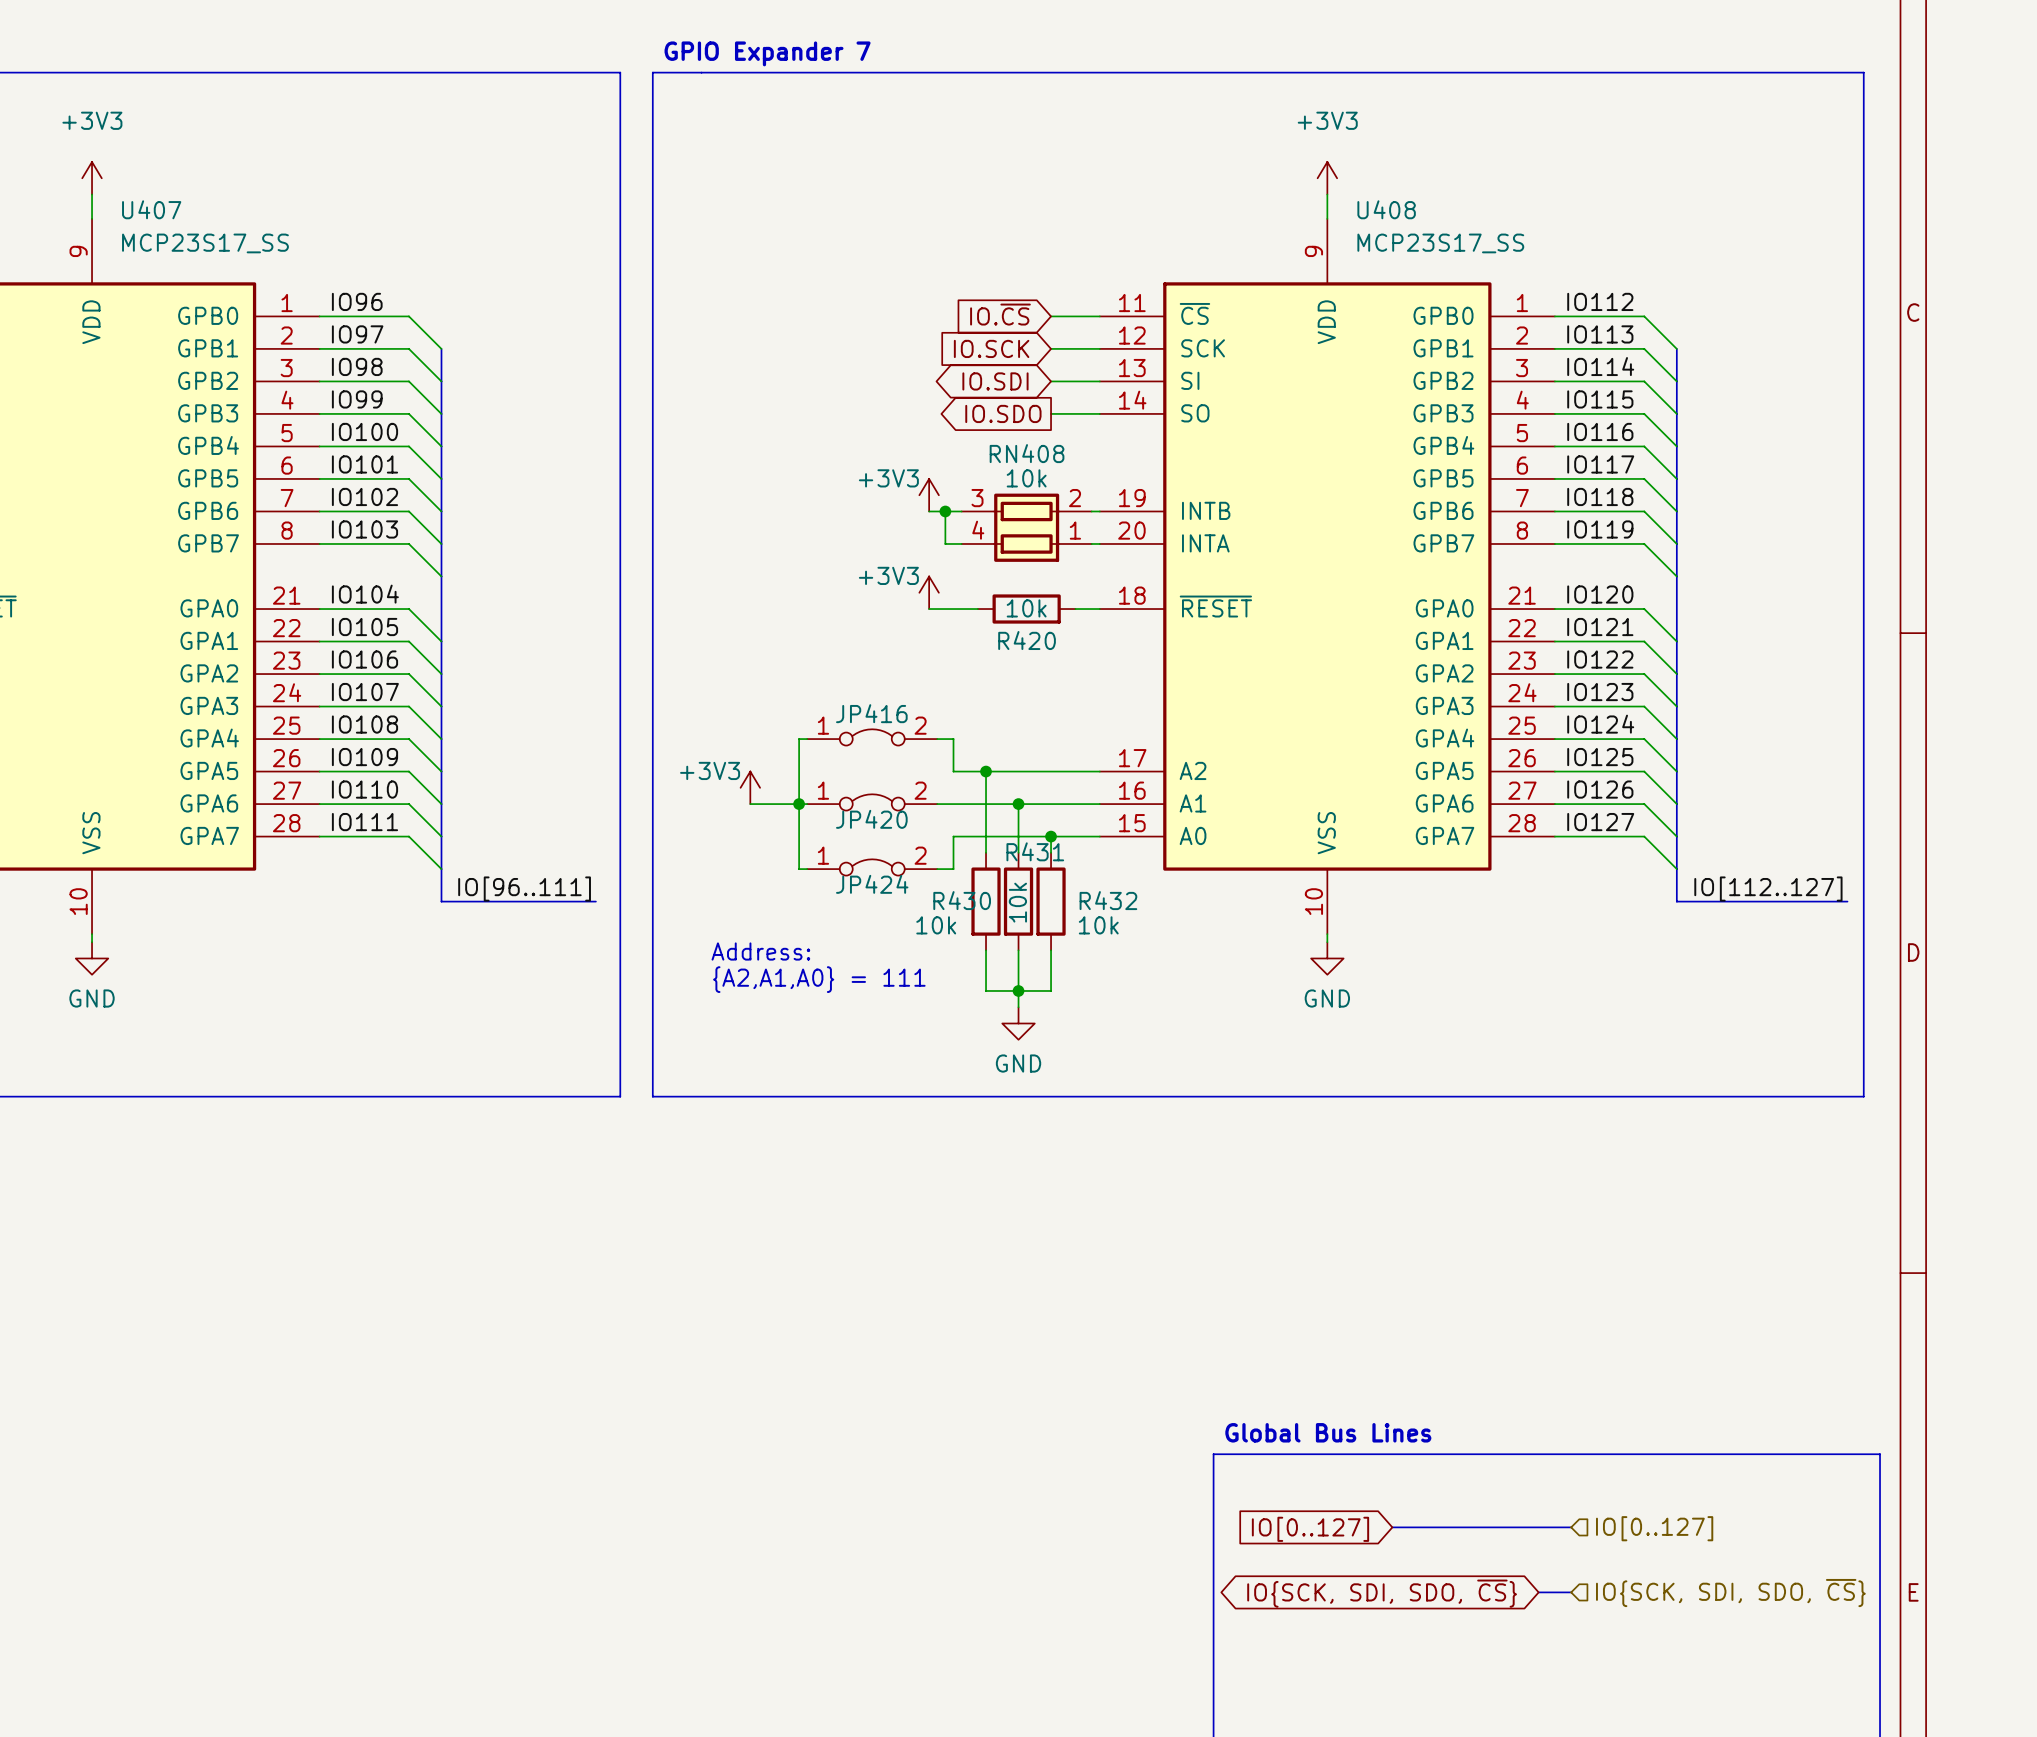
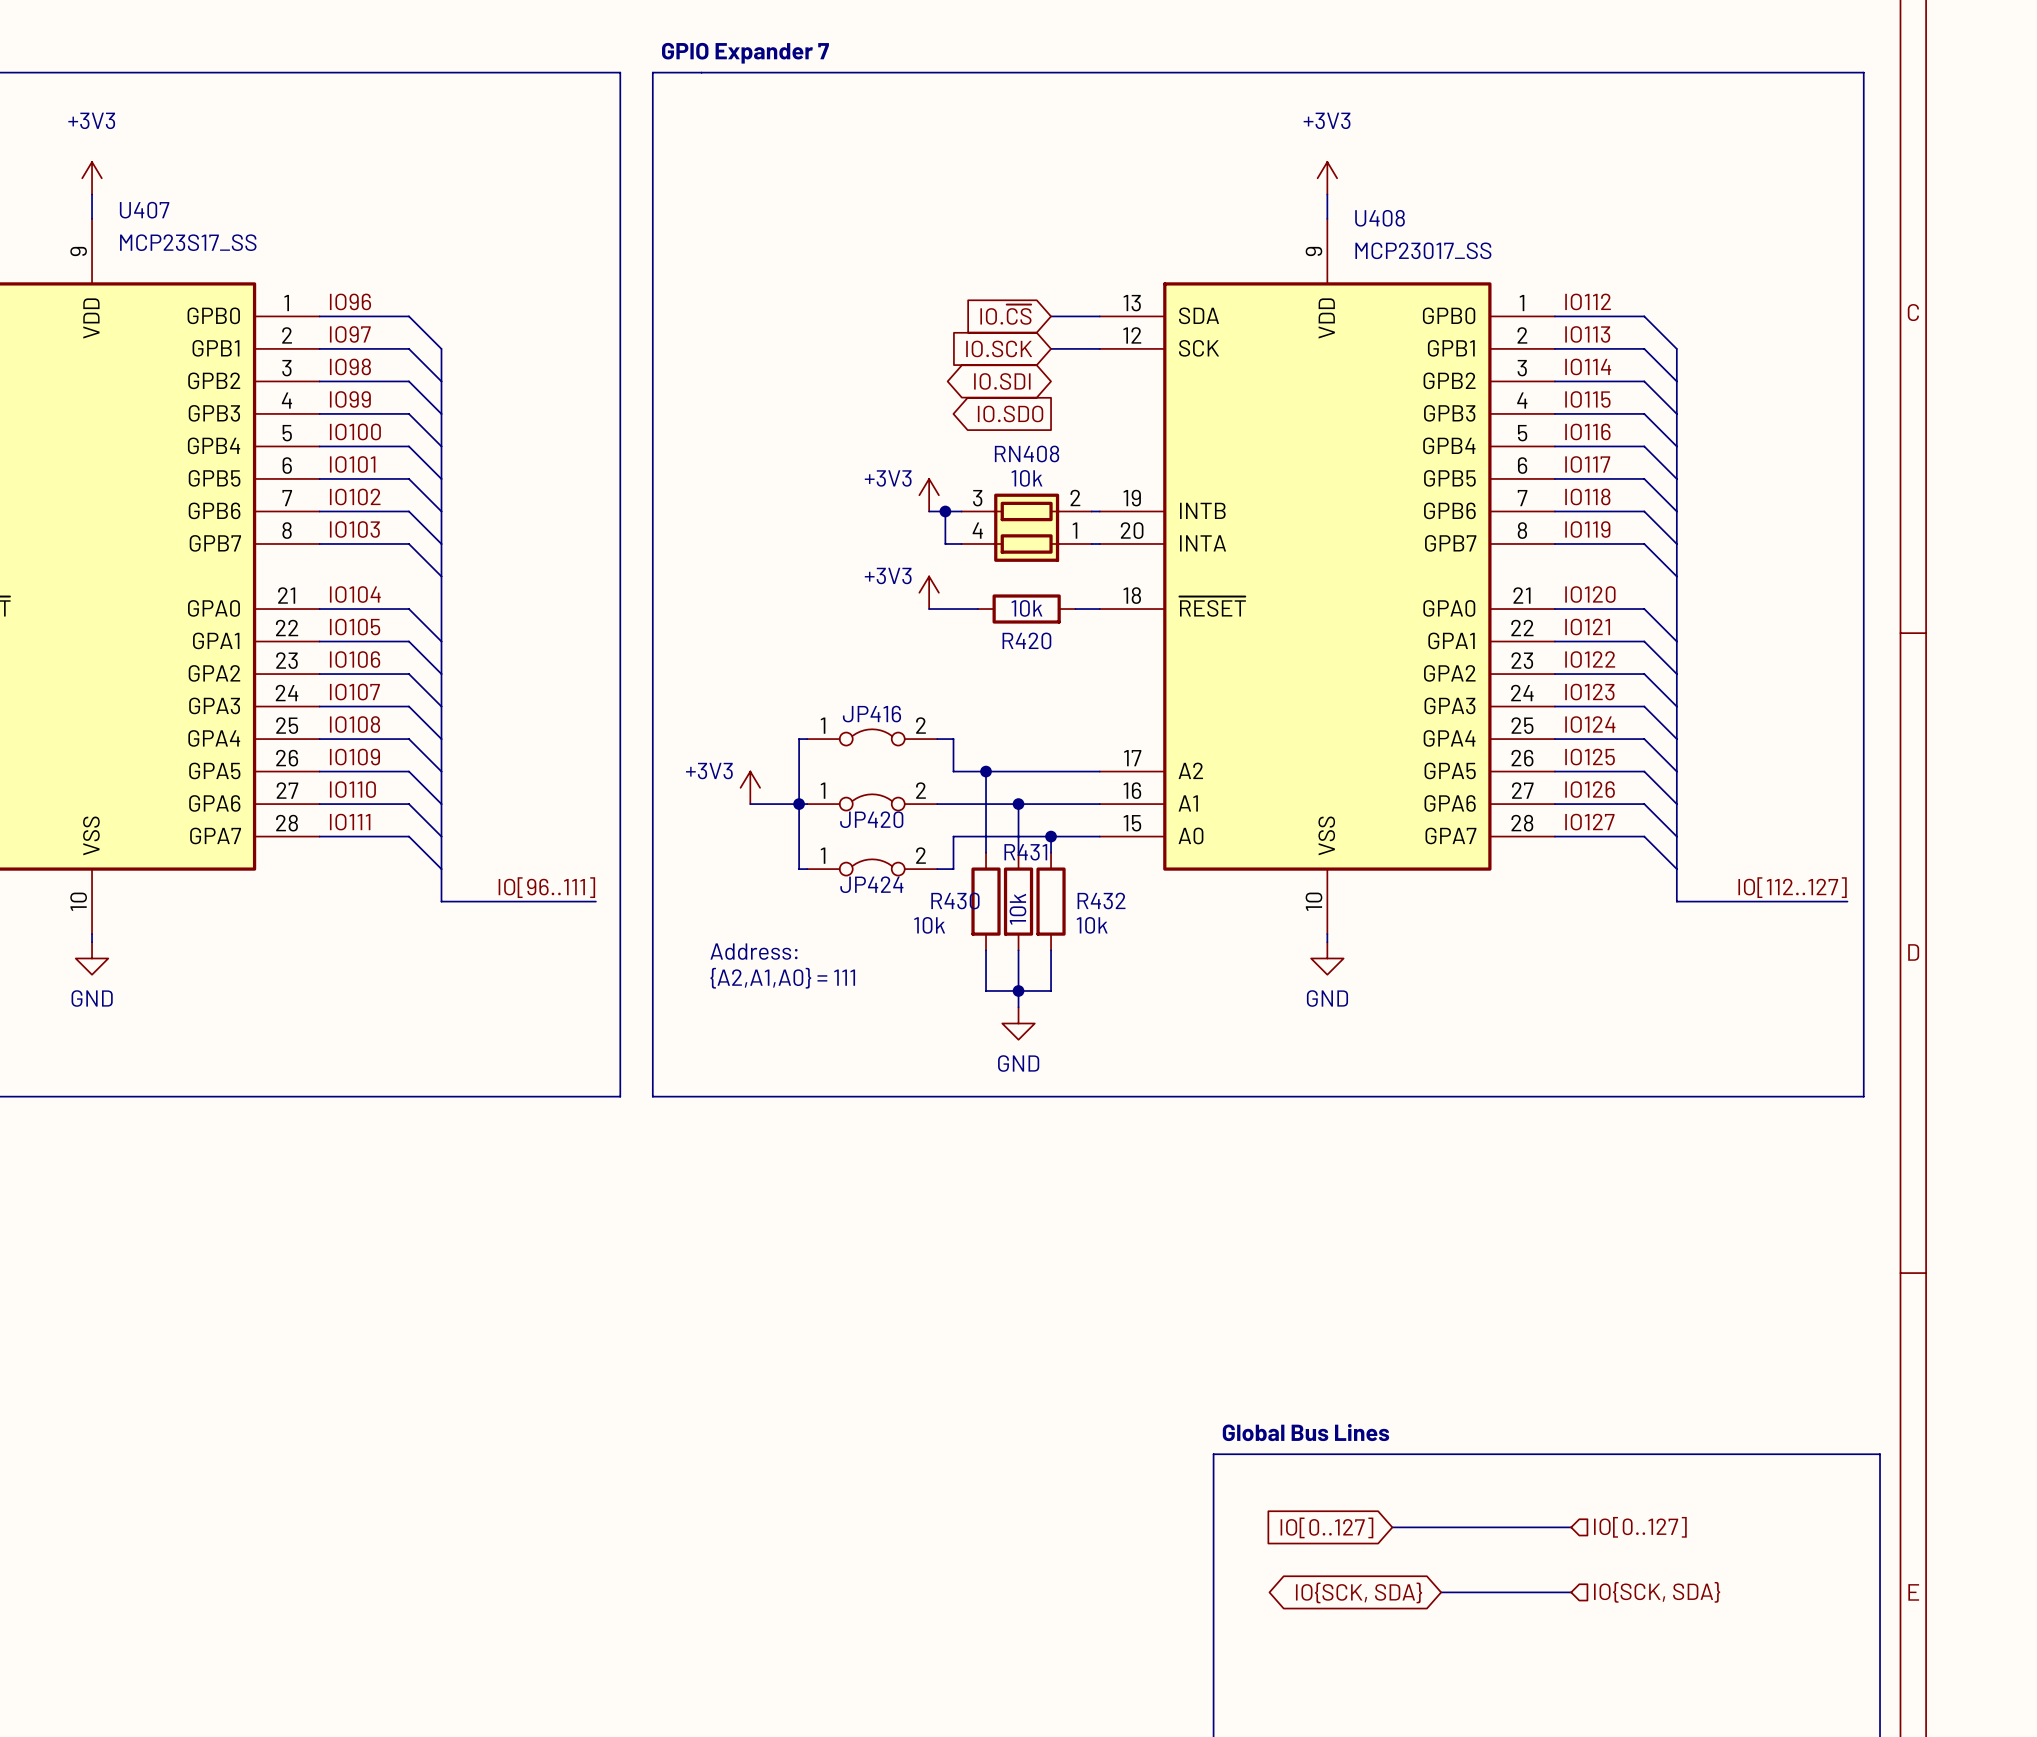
U408 symbol: [1099, 218, 1555, 935] -> [1099, 218, 1555, 935]
U408 value: MCP23S17_SS (1440, 243) -> MCP23017_SS (1423, 250)
wire: (1051, 381) (1099, 381) -> none
wire: (1051, 413) (1099, 413) -> none
bus: none -> (1441, 1592) (1538, 1592)
global label: IO{SCK, SDI, SDO, ~{CS}} (1382, 1593) -> IO{SCK, SDA} (1359, 1592)
hierarchical label: IO{SCK, SDI, SDO, ~{CS}} (1730, 1593) -> IO{SCK, SDA} (1657, 1592)

